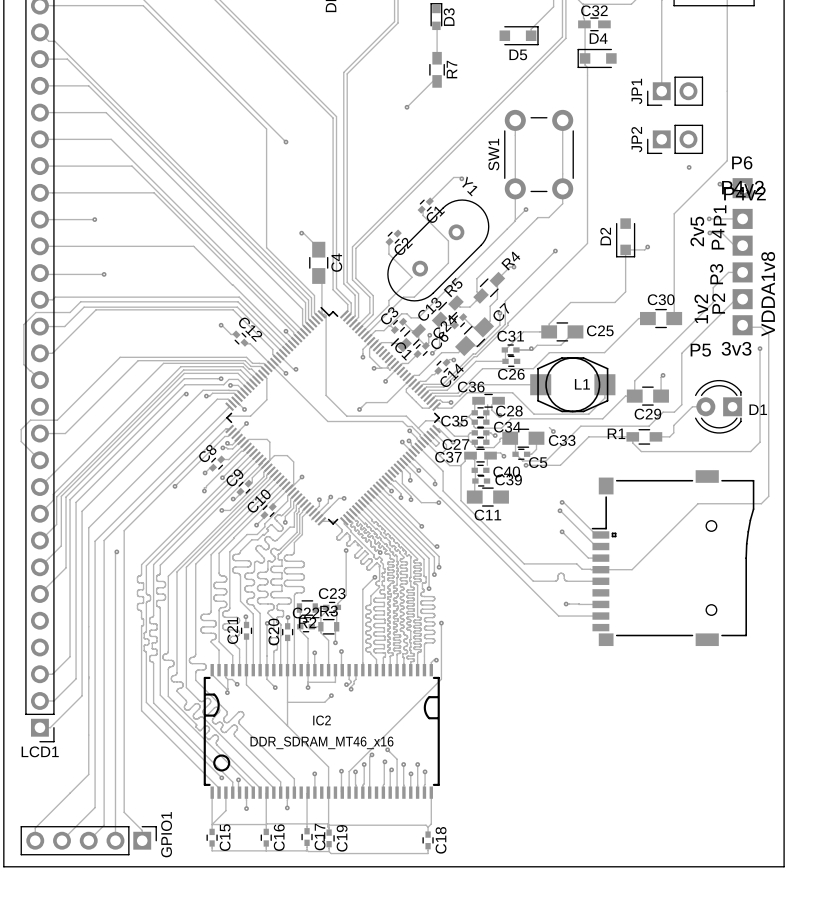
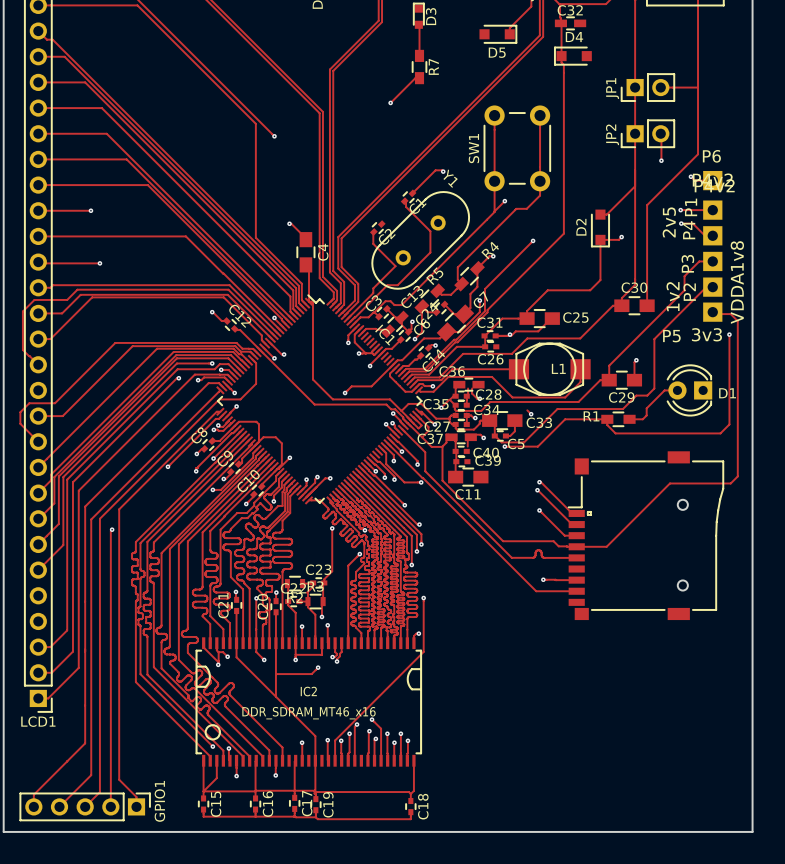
track: none -> (635, 87) (635, 284) (621, 298) (621, 305)
track: none -> (660, 87) (698, 87)
track: none -> (661, 134) (661, 160)
track: none -> (635, 186) (606, 214) (600, 214)

